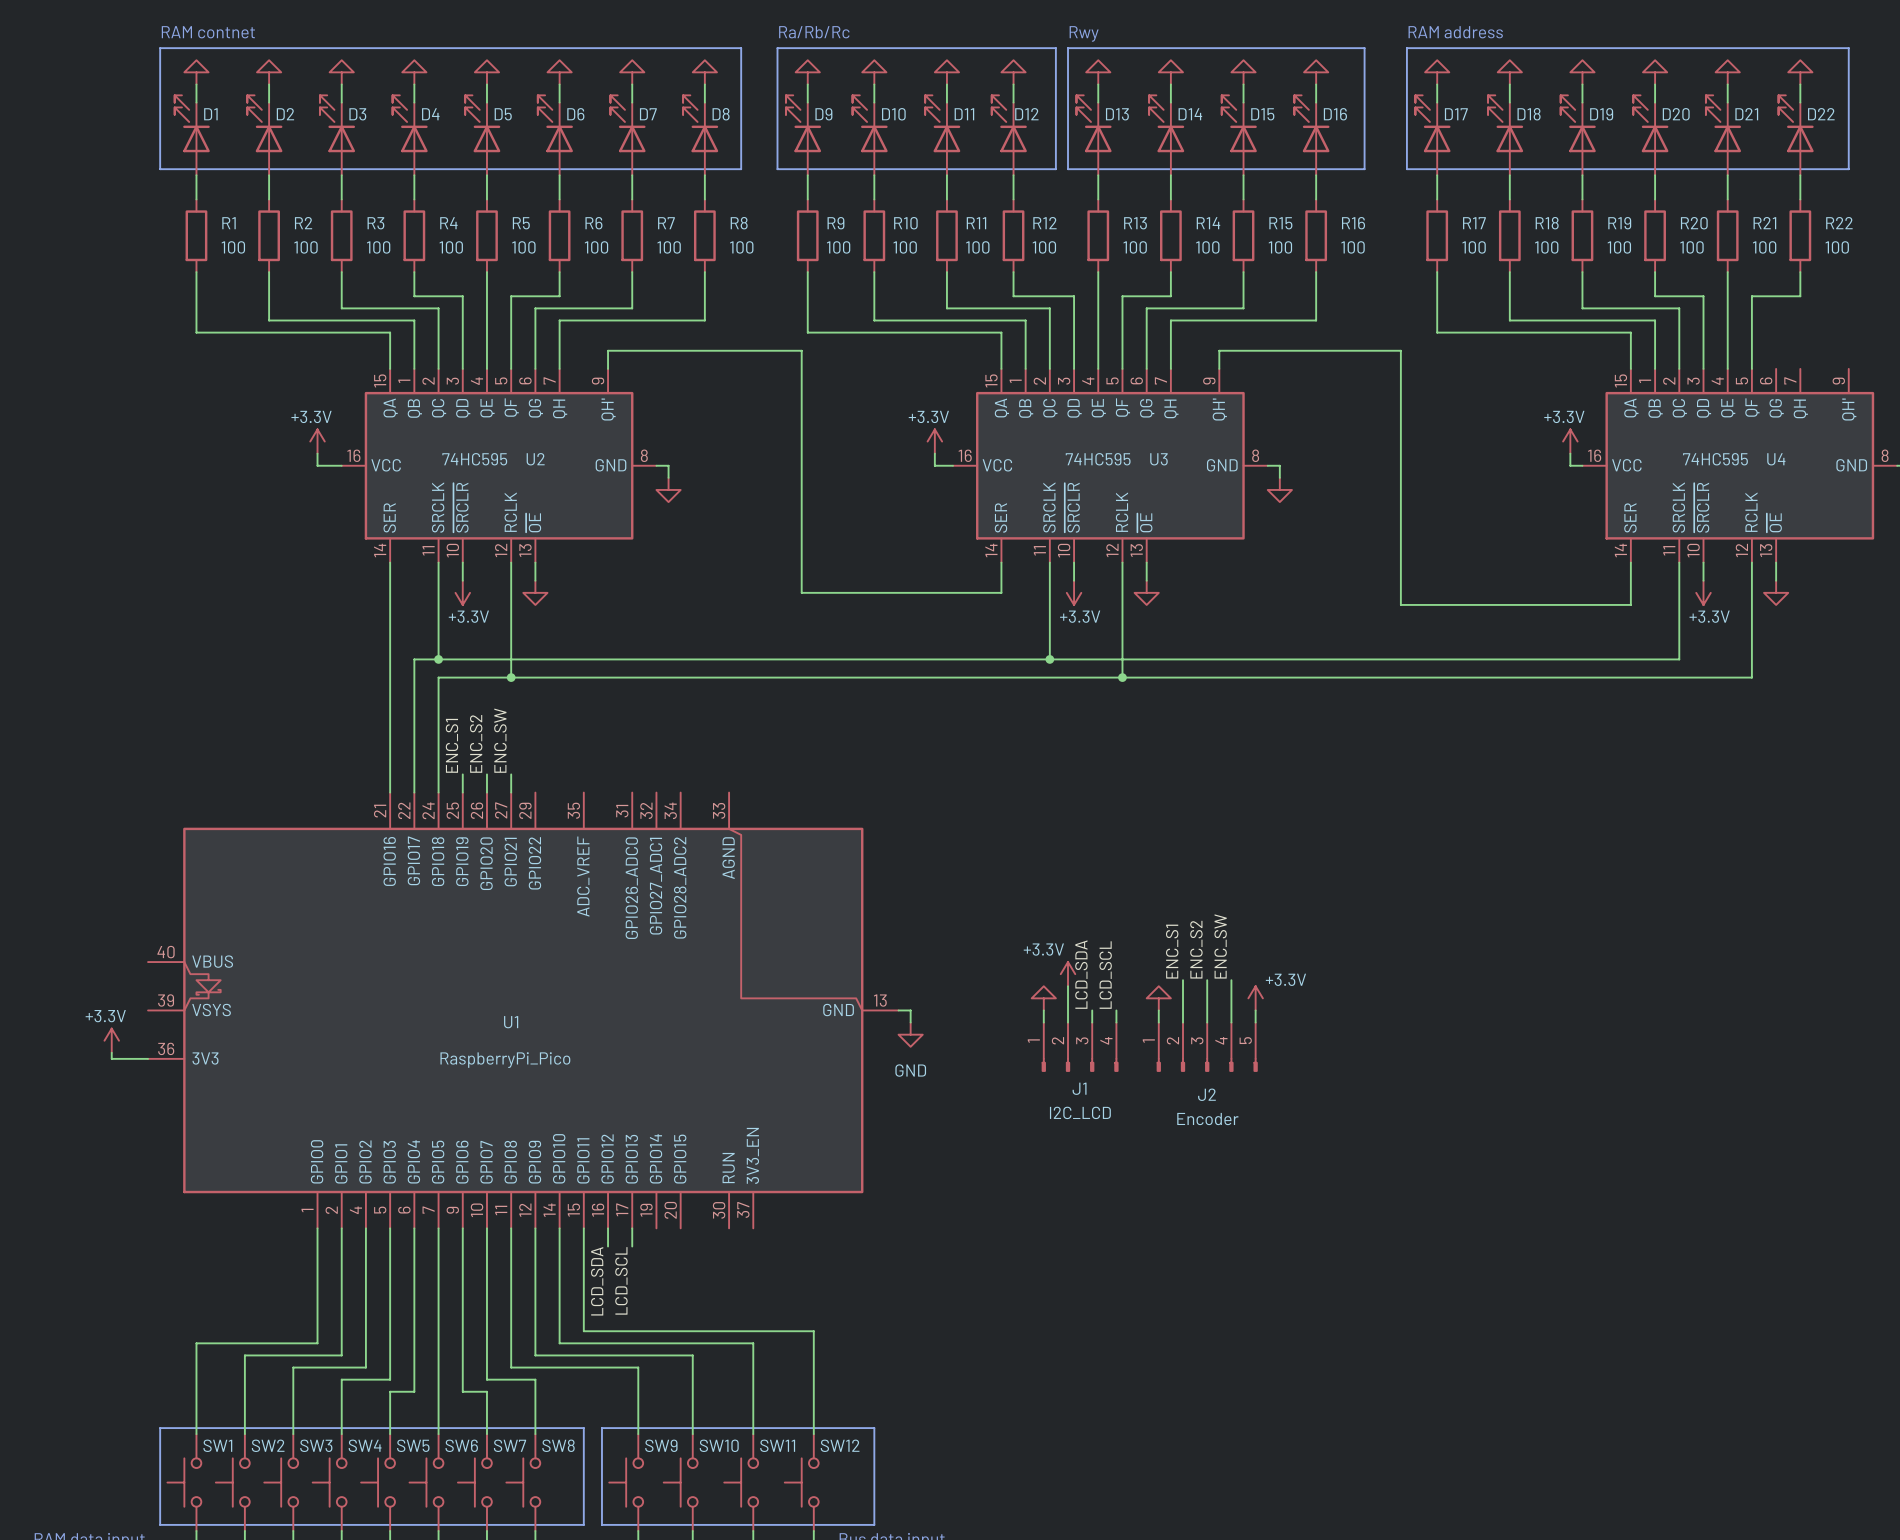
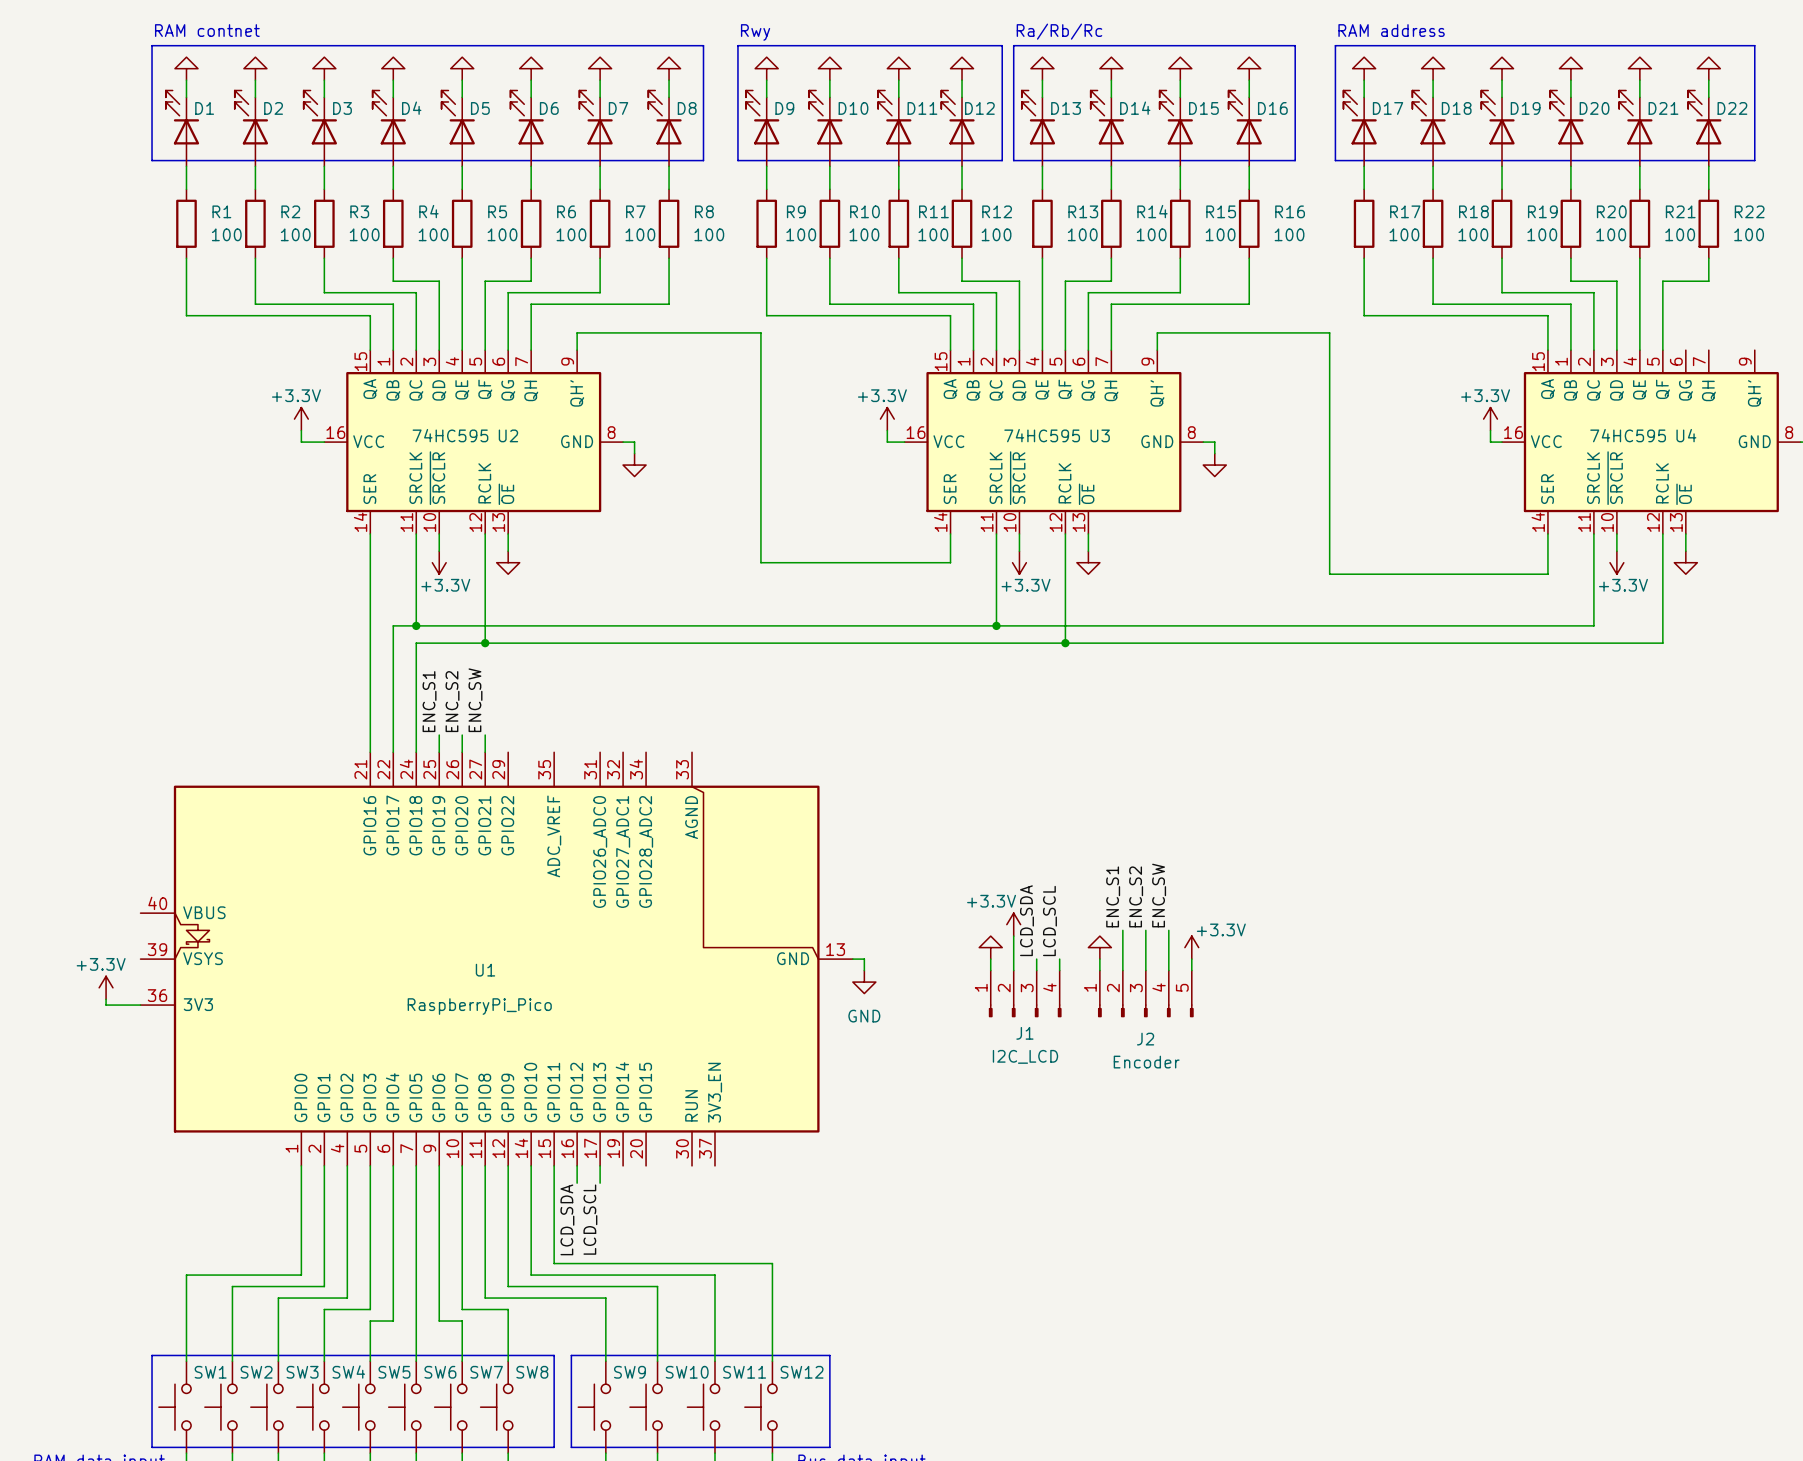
text: Ra/Rb/Rc (814, 32) -> Rwy (755, 32)
text: Rwy (1084, 33) -> Ra/Rb/Rc (1059, 31)

